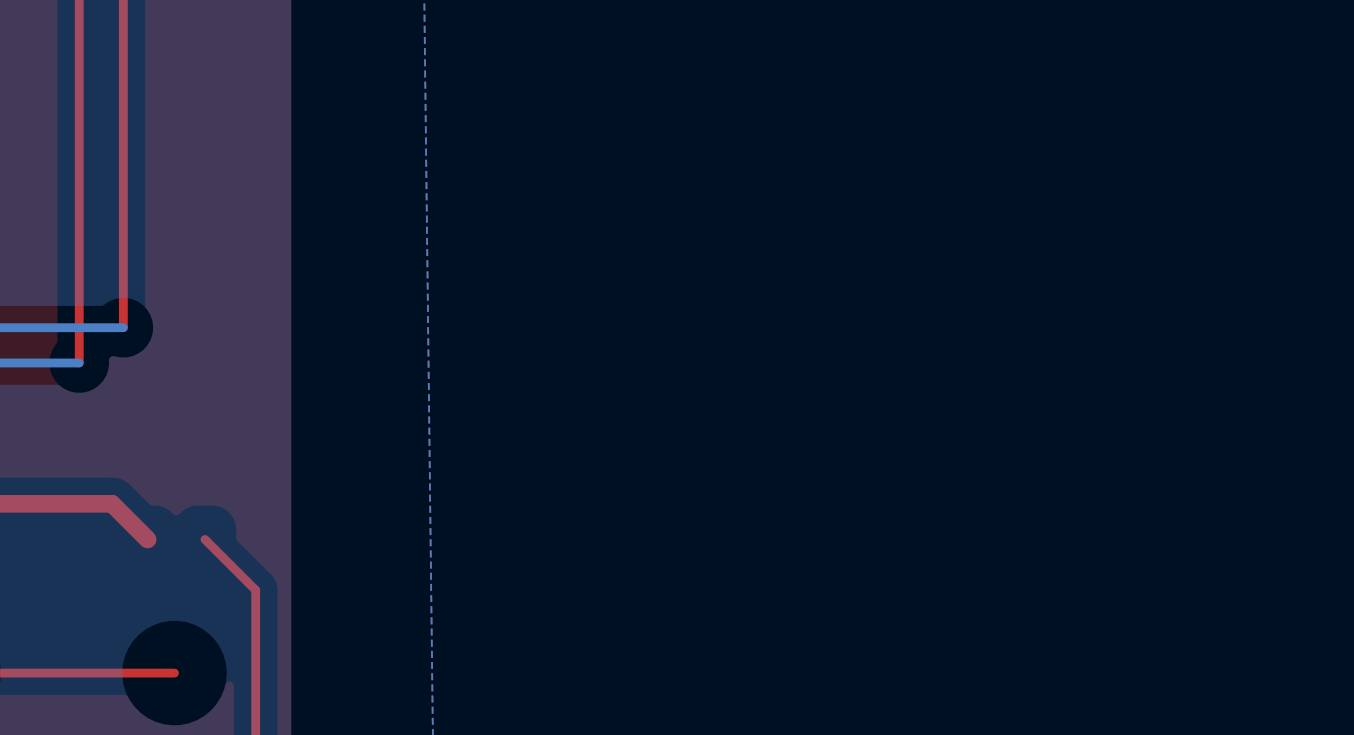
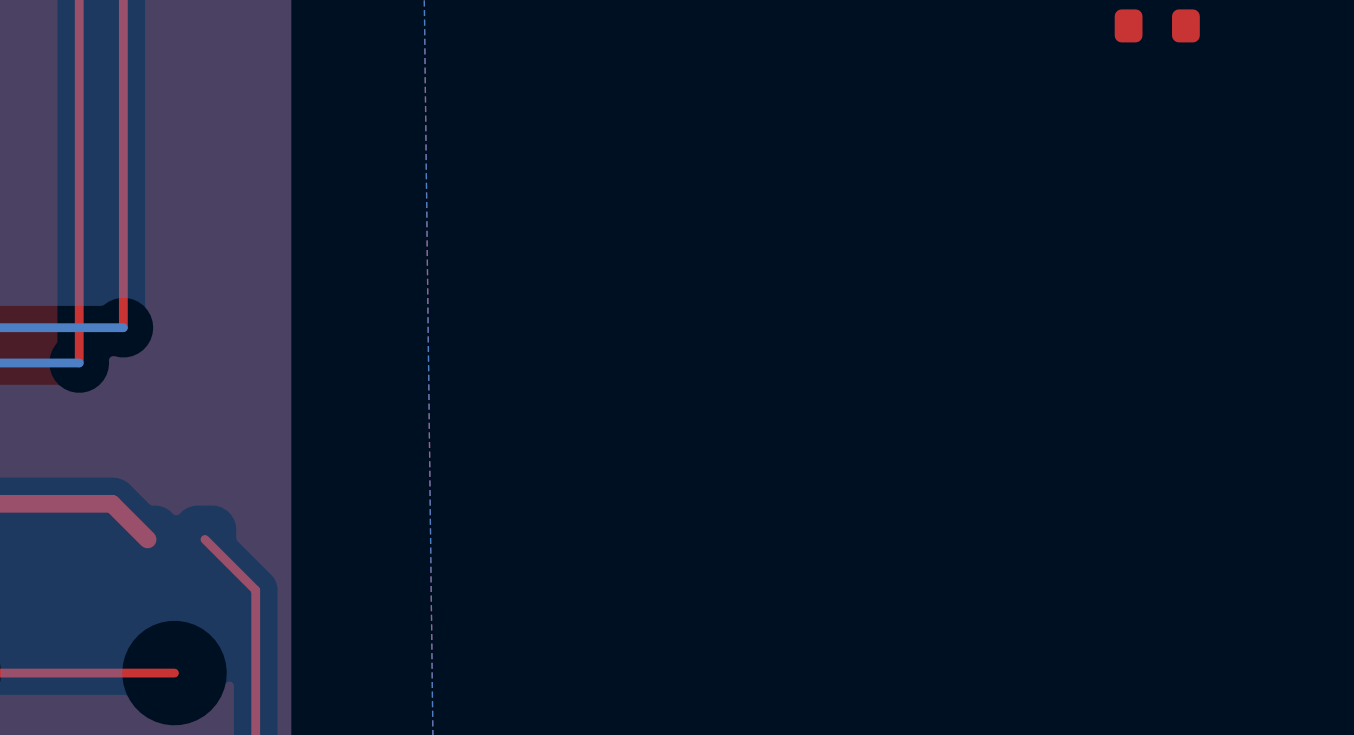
part: none -> (1157, 25)

